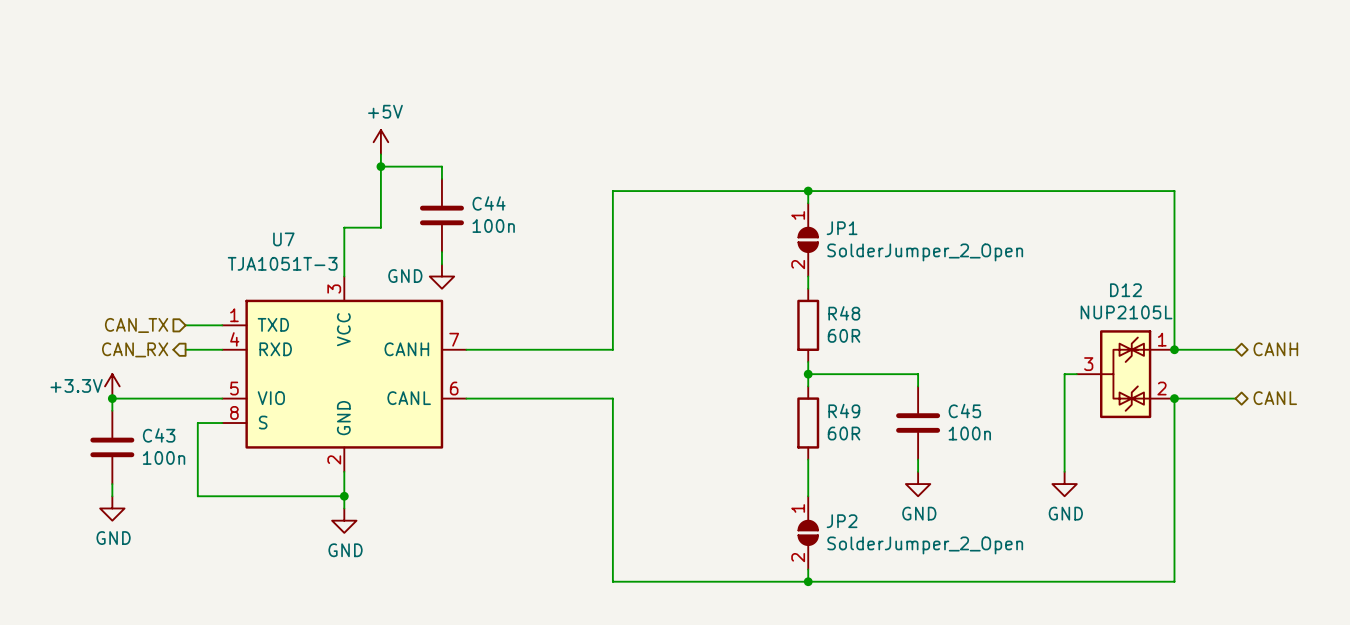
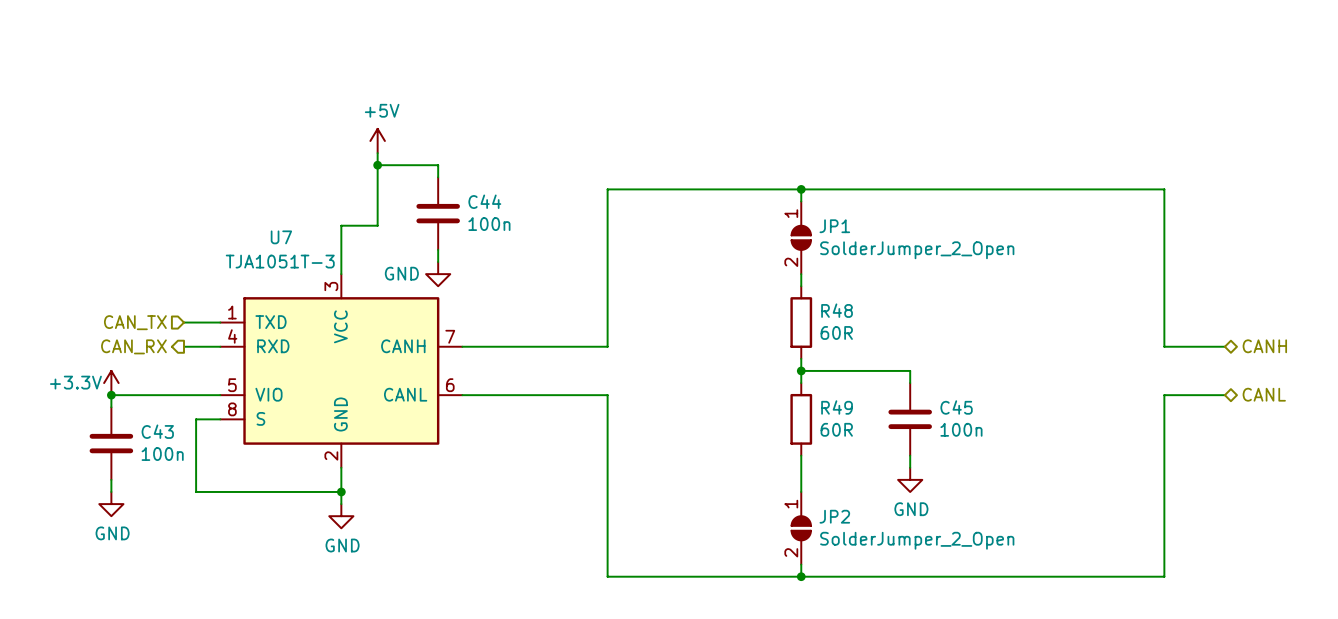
junction: (1174, 349) -> none
wire: (1076, 374) (1064, 374) (1064, 471) -> none
D12: NUP2105L (1125, 374) -> none
junction: (1174, 398) -> none
power symbol: GND (1064, 484) -> none

